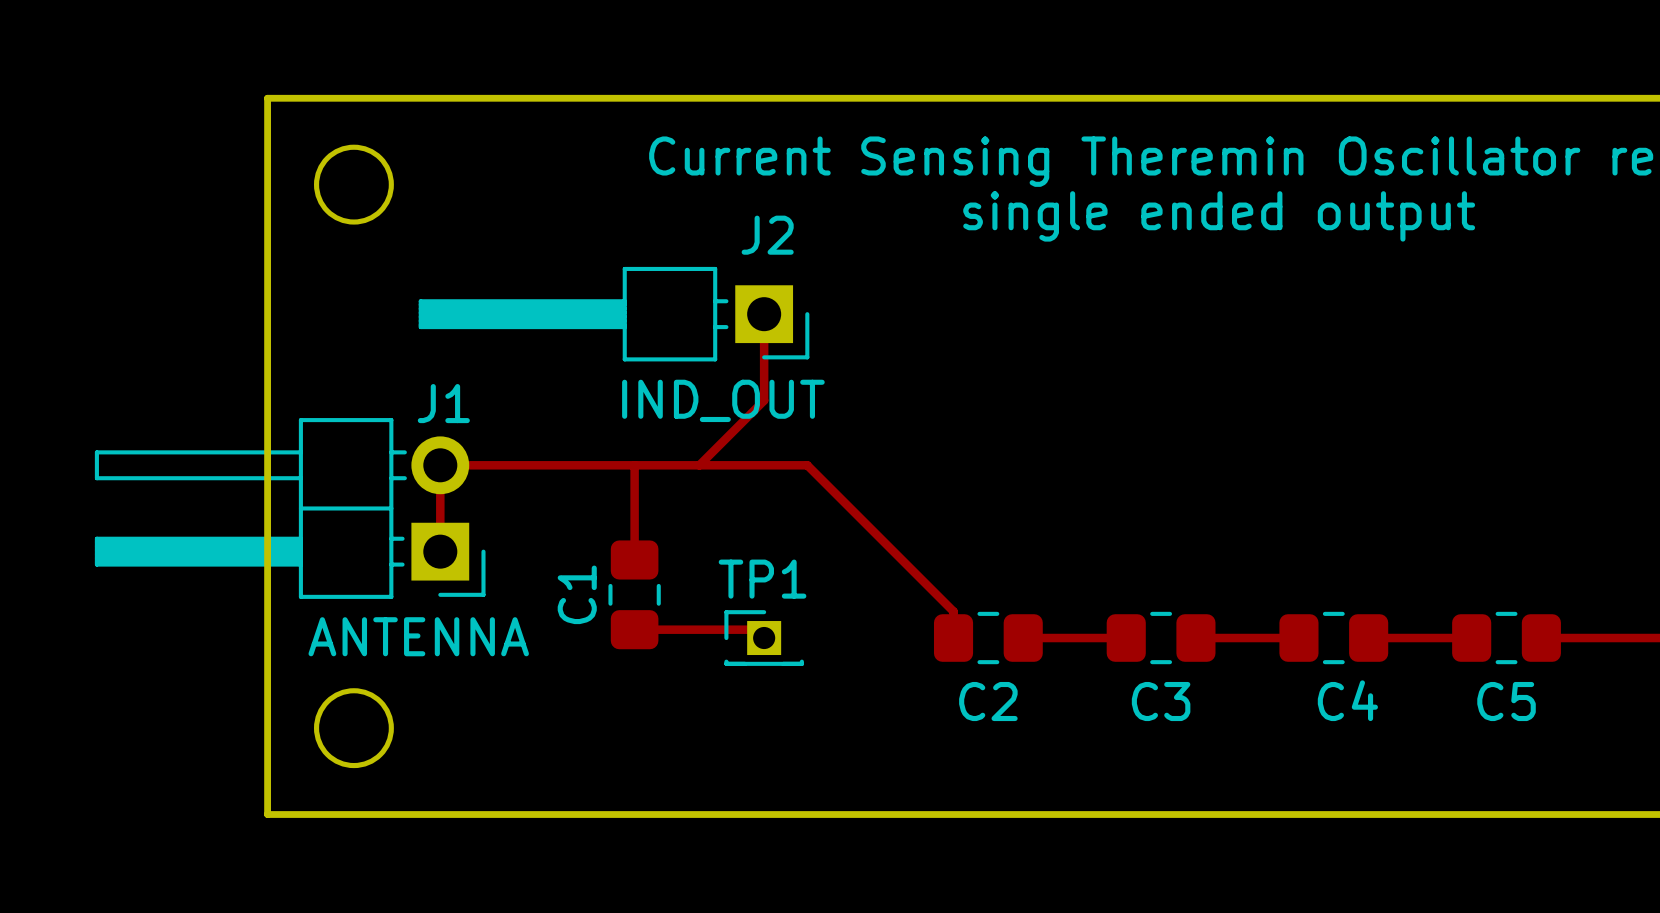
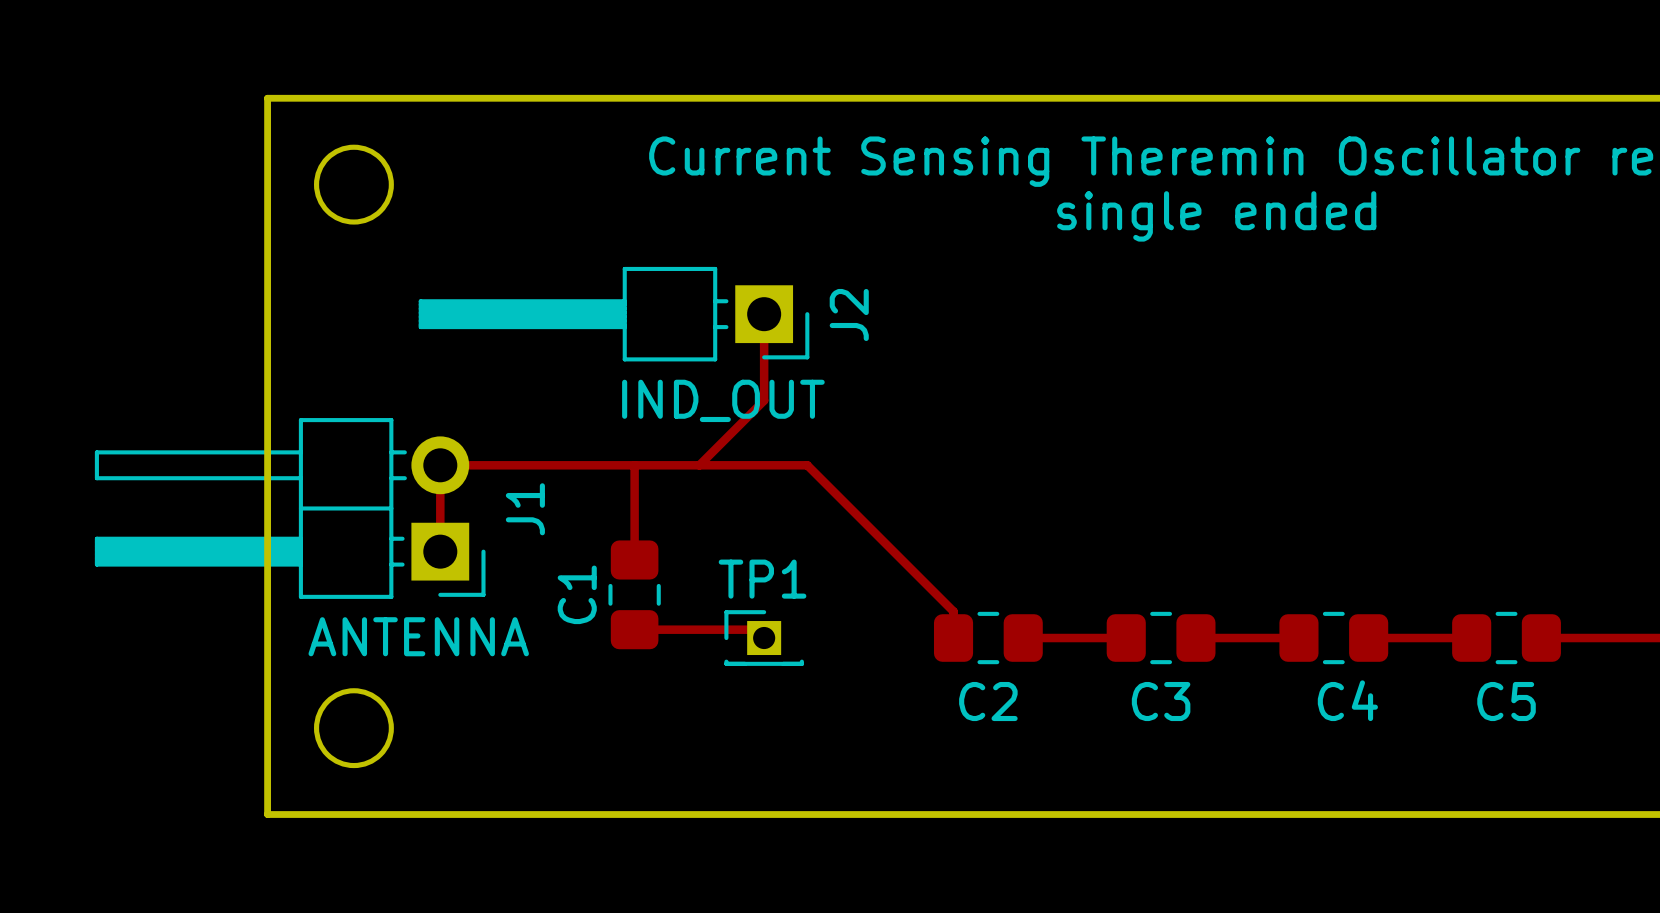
text: single ended output (1219, 216) -> single ended (1216, 216)
J2 name rotation: 0° (767, 235) -> 90° counterclockwise (849, 314)
J2 name position: J2 (767, 235) -> J2 (849, 314)
J1 name rotation: 0° (443, 403) -> 90° counterclockwise (525, 509)
J1 name position: J1 (443, 403) -> J1 (525, 509)

